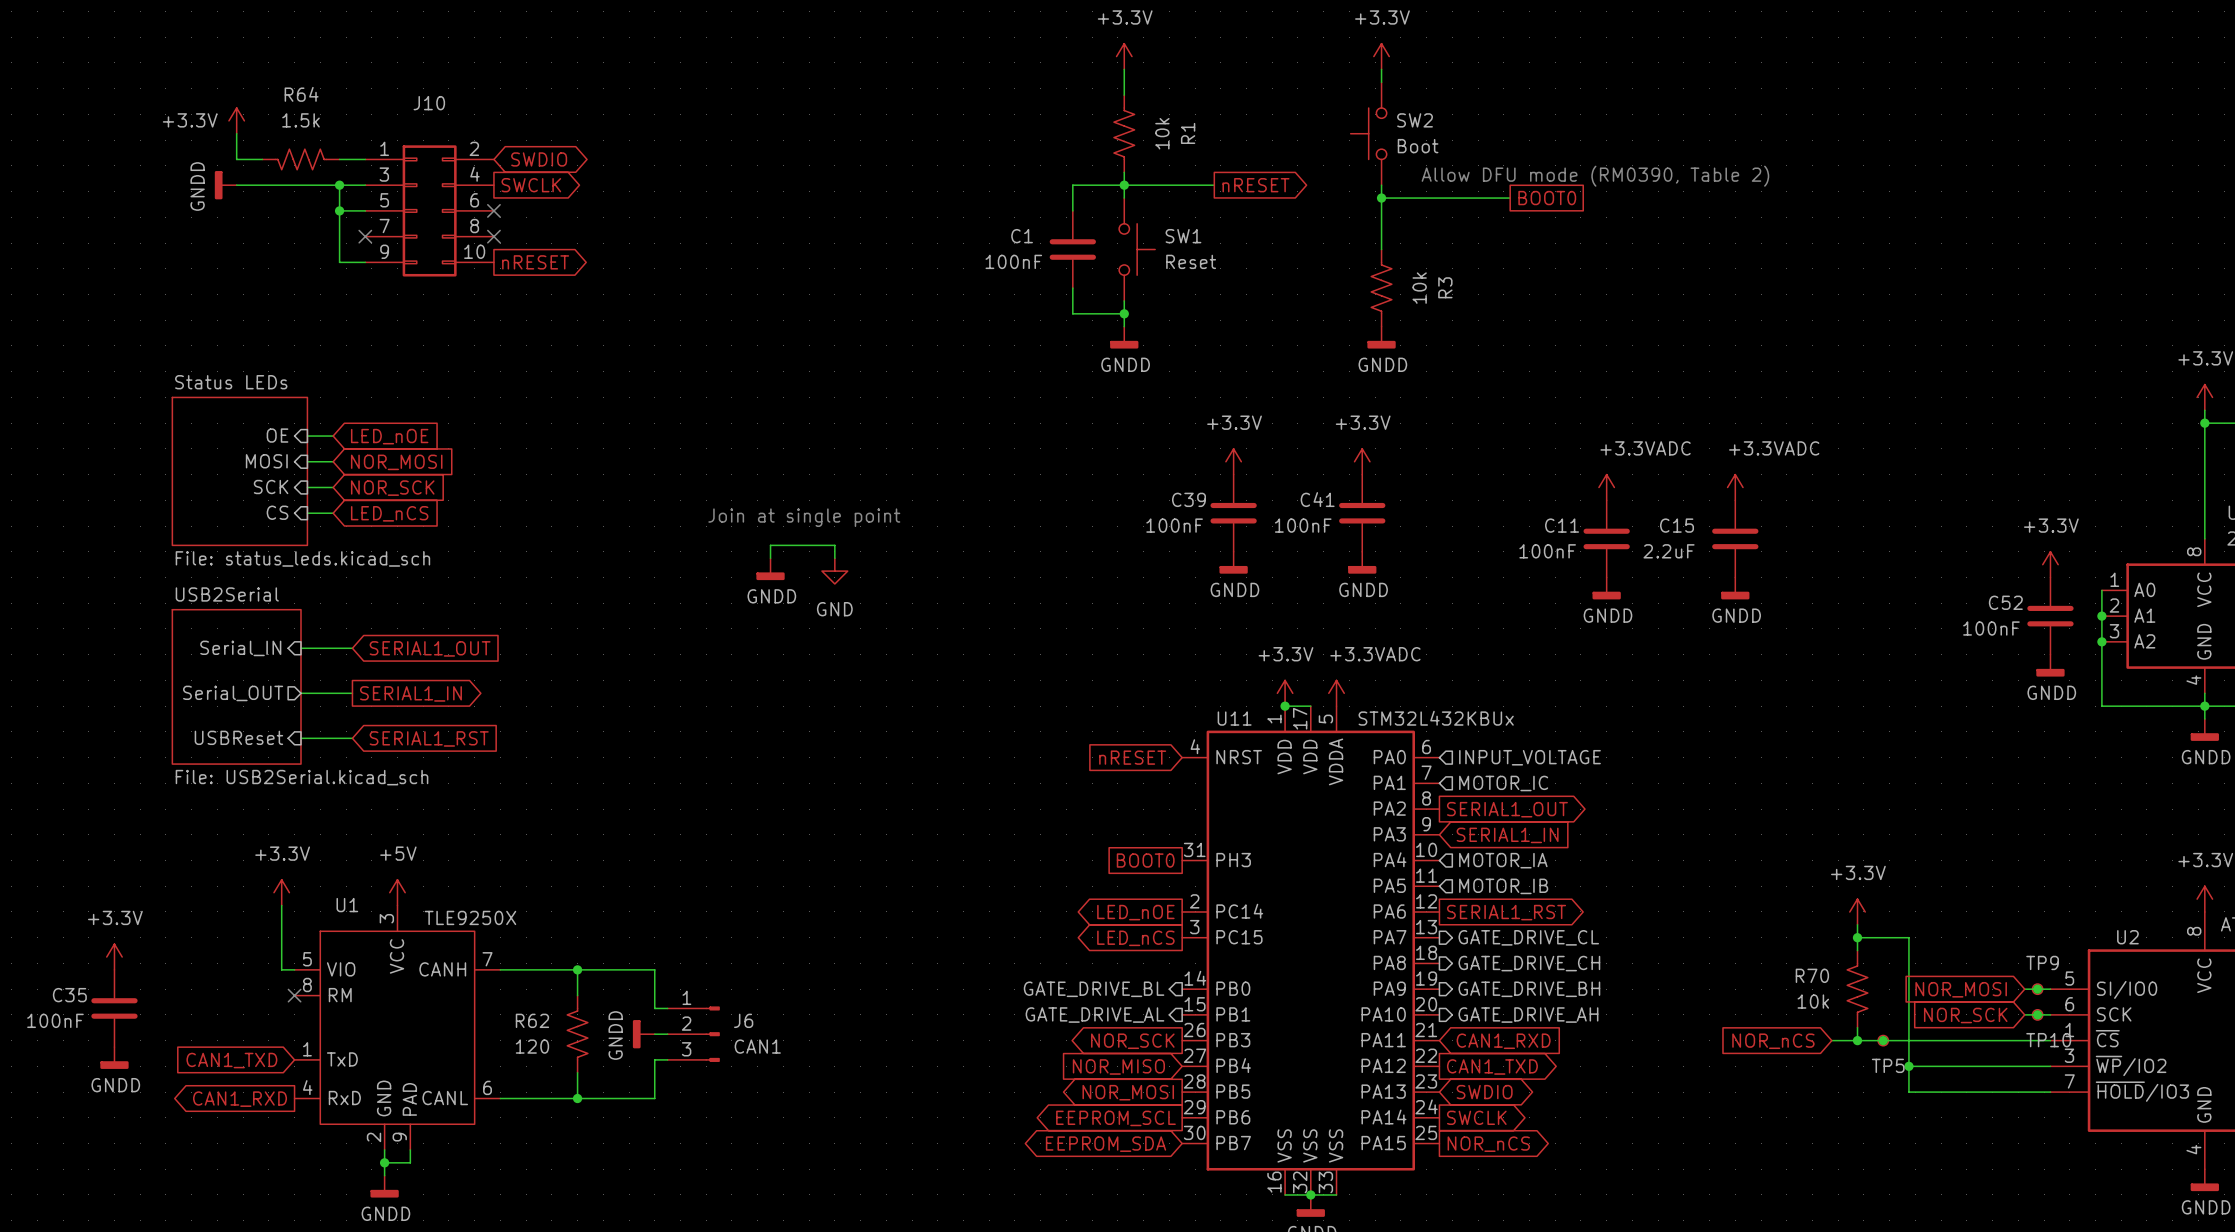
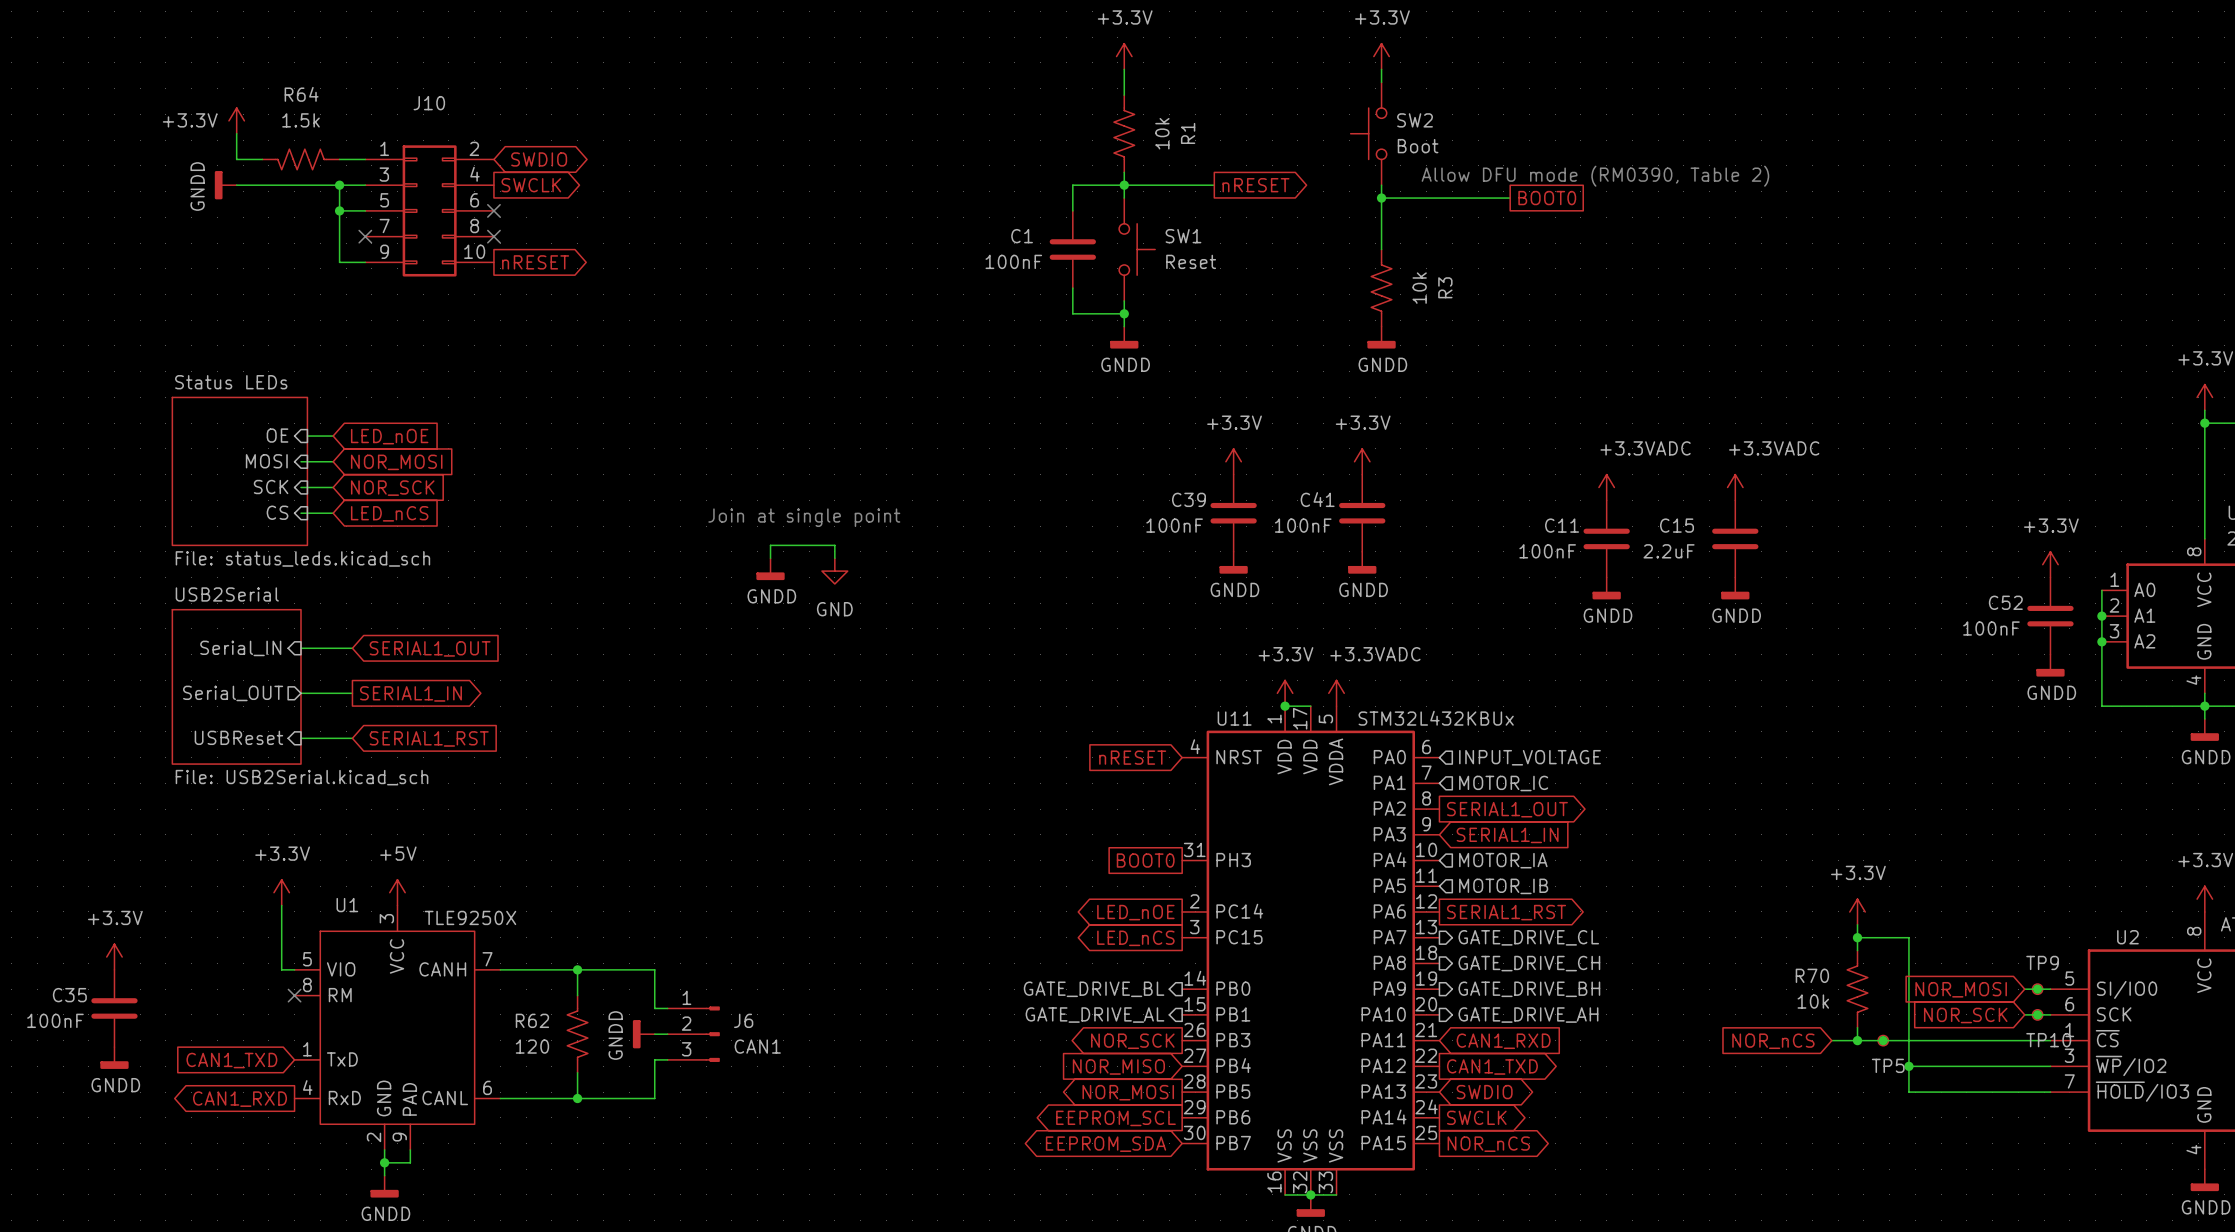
wire: none -> (300, 461) (307, 461)
wire: none -> (300, 487) (307, 487)
wire: none -> (300, 513) (307, 513)

